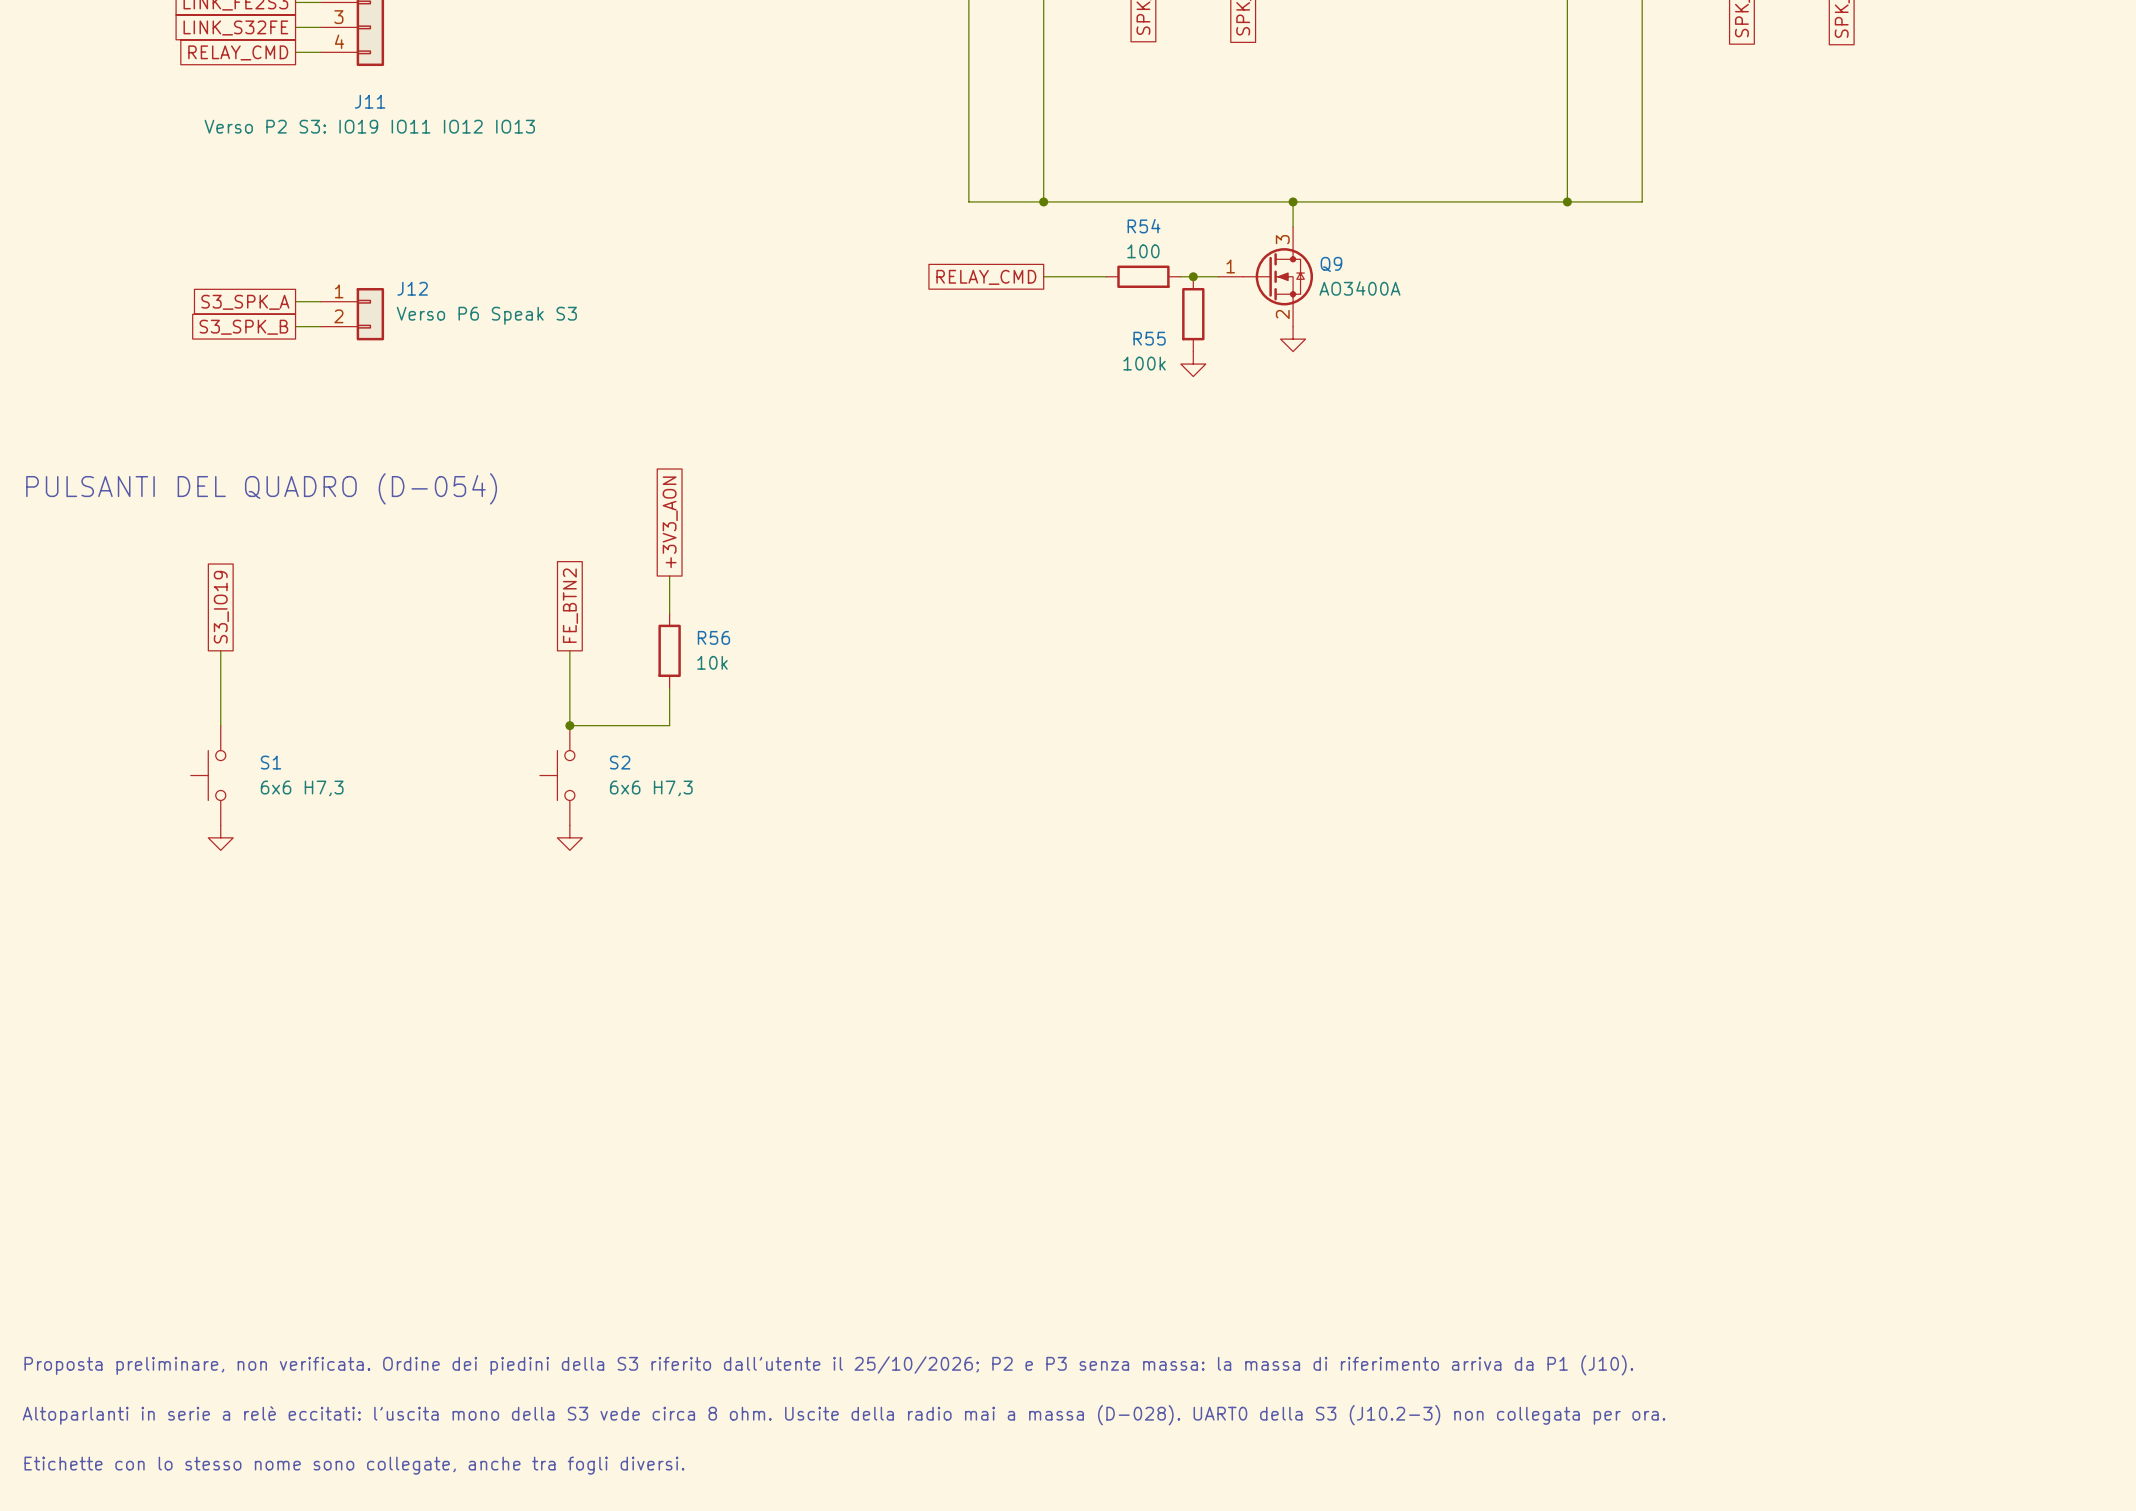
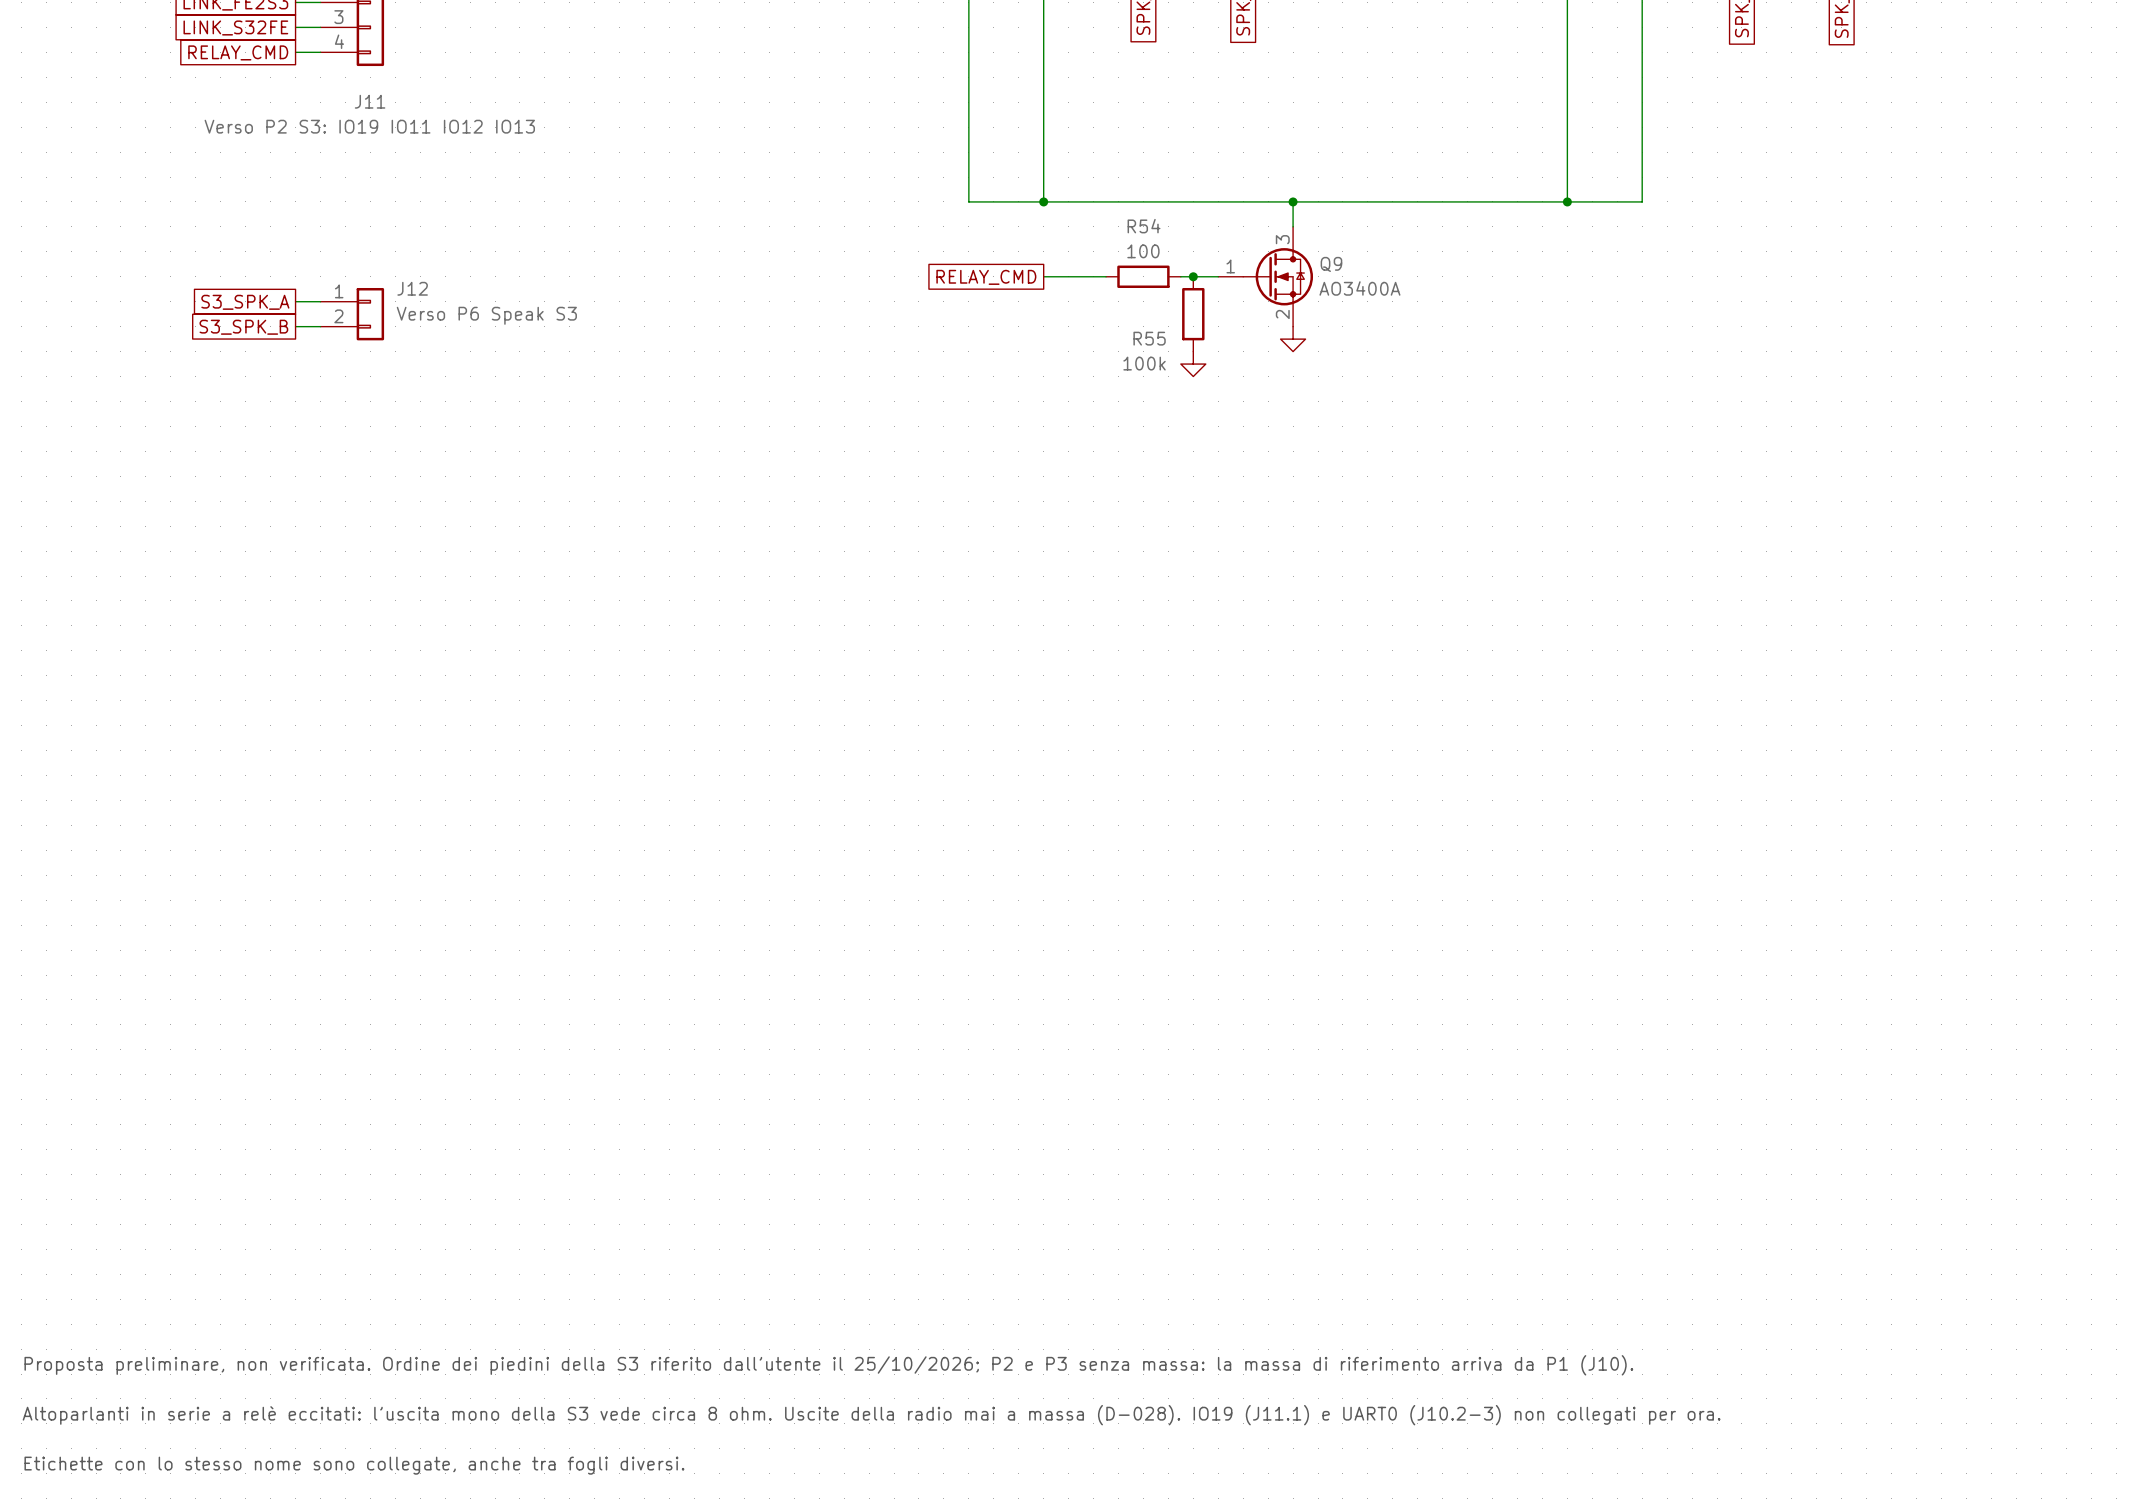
text: PULSANTI DEL QUADRO (D-054) (261, 488) -> none
global label: +3V3_AON (670, 522) -> none
wire: (669, 576) (669, 613) -> none
global label: FE_BTN2 (570, 605) -> none
global label: S3_IO19 (221, 607) -> none
wire: (220, 650) (220, 725) -> none
wire: (569, 650) (569, 725) (669, 725) (669, 688) -> none
R56: 10k (669, 650) -> none
junction: (569, 725) -> none
S1: 6x6 H7,3 (208, 775) -> none
S2: 6x6 H7,3 (557, 775) -> none
power symbol: (220, 837) -> none
power symbol: (569, 837) -> none
text: Altoparlanti in serie a relè eccitati: l’uscita mono della S3 vede circa 8 ohm. Uscite della radio mai a massa (D-028). UART0 della S3 (J10.2-3) non collegata per ora. (843, 1415) -> Altoparlanti in serie a relè eccitati: l’uscita mono della S3 vede circa 8 ohm. Uscite della radio mai a massa (D-028). IO19 (J11.1) e UART0 (J10.2-3) non collegati per ora. (871, 1415)

